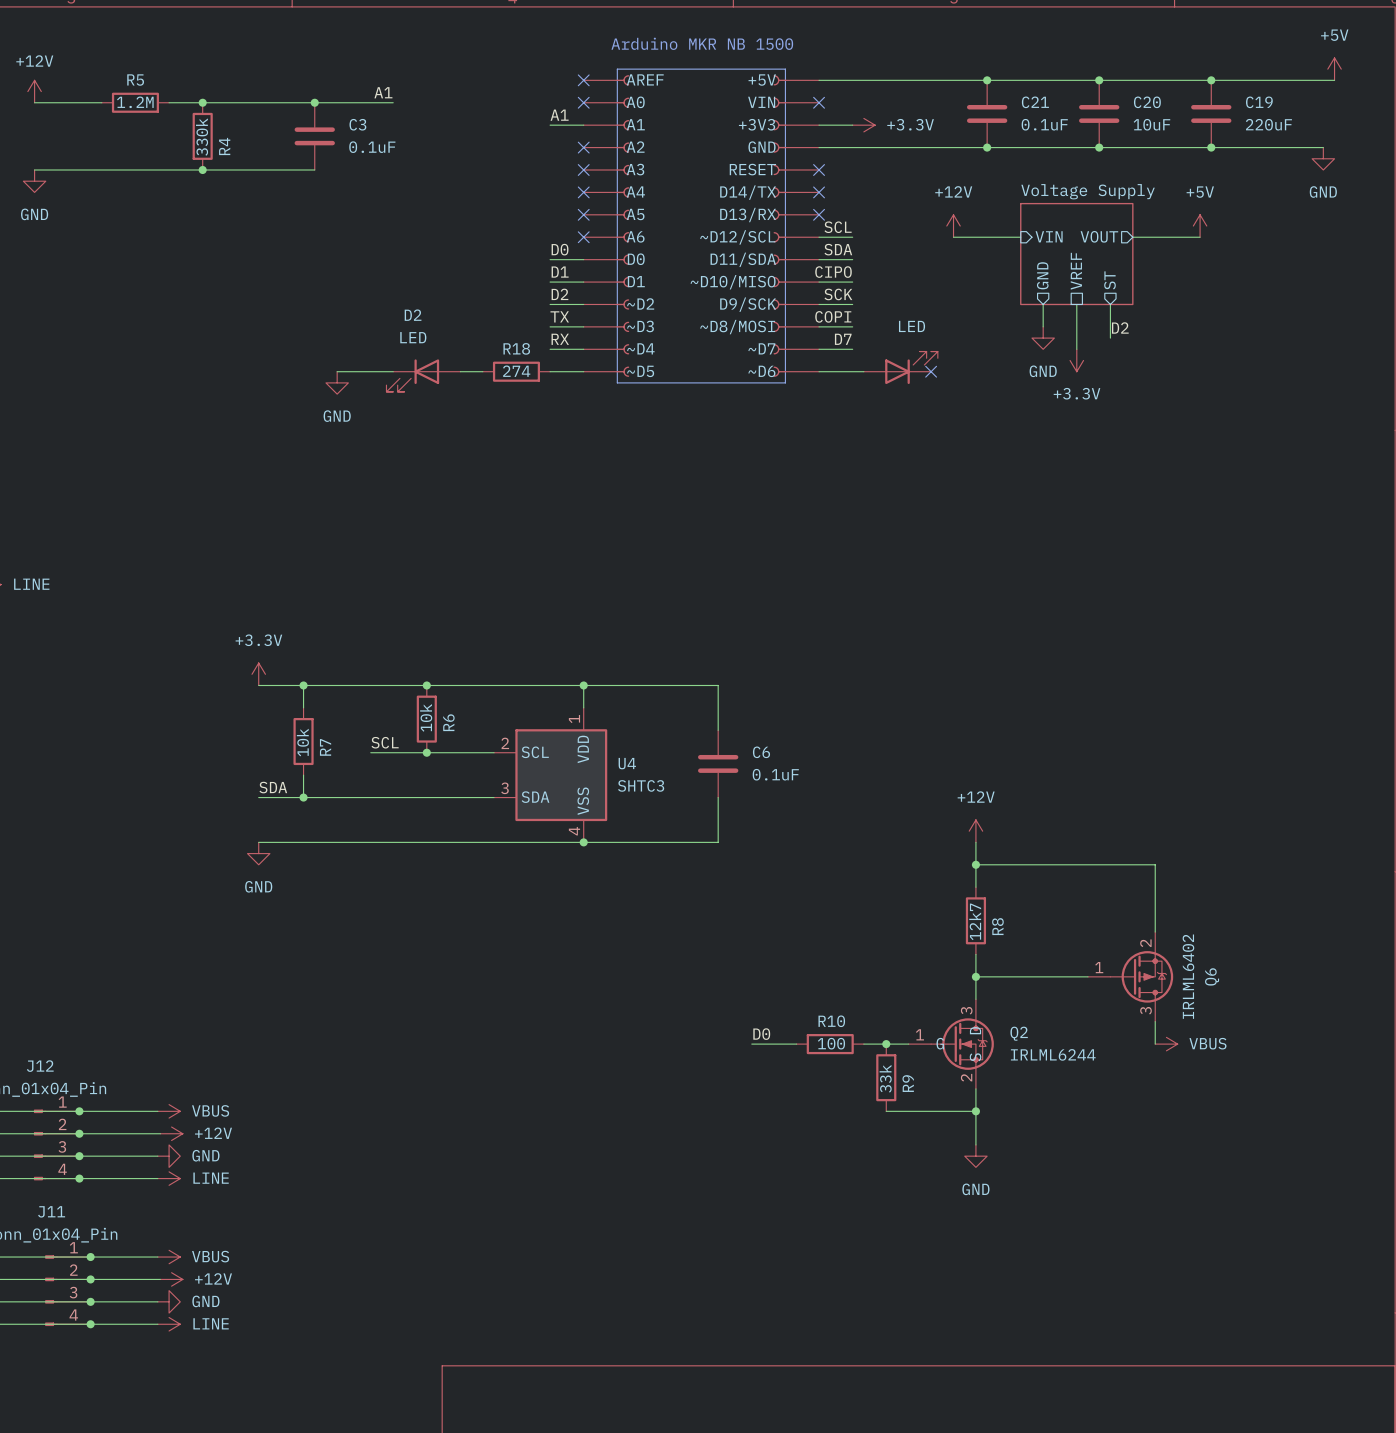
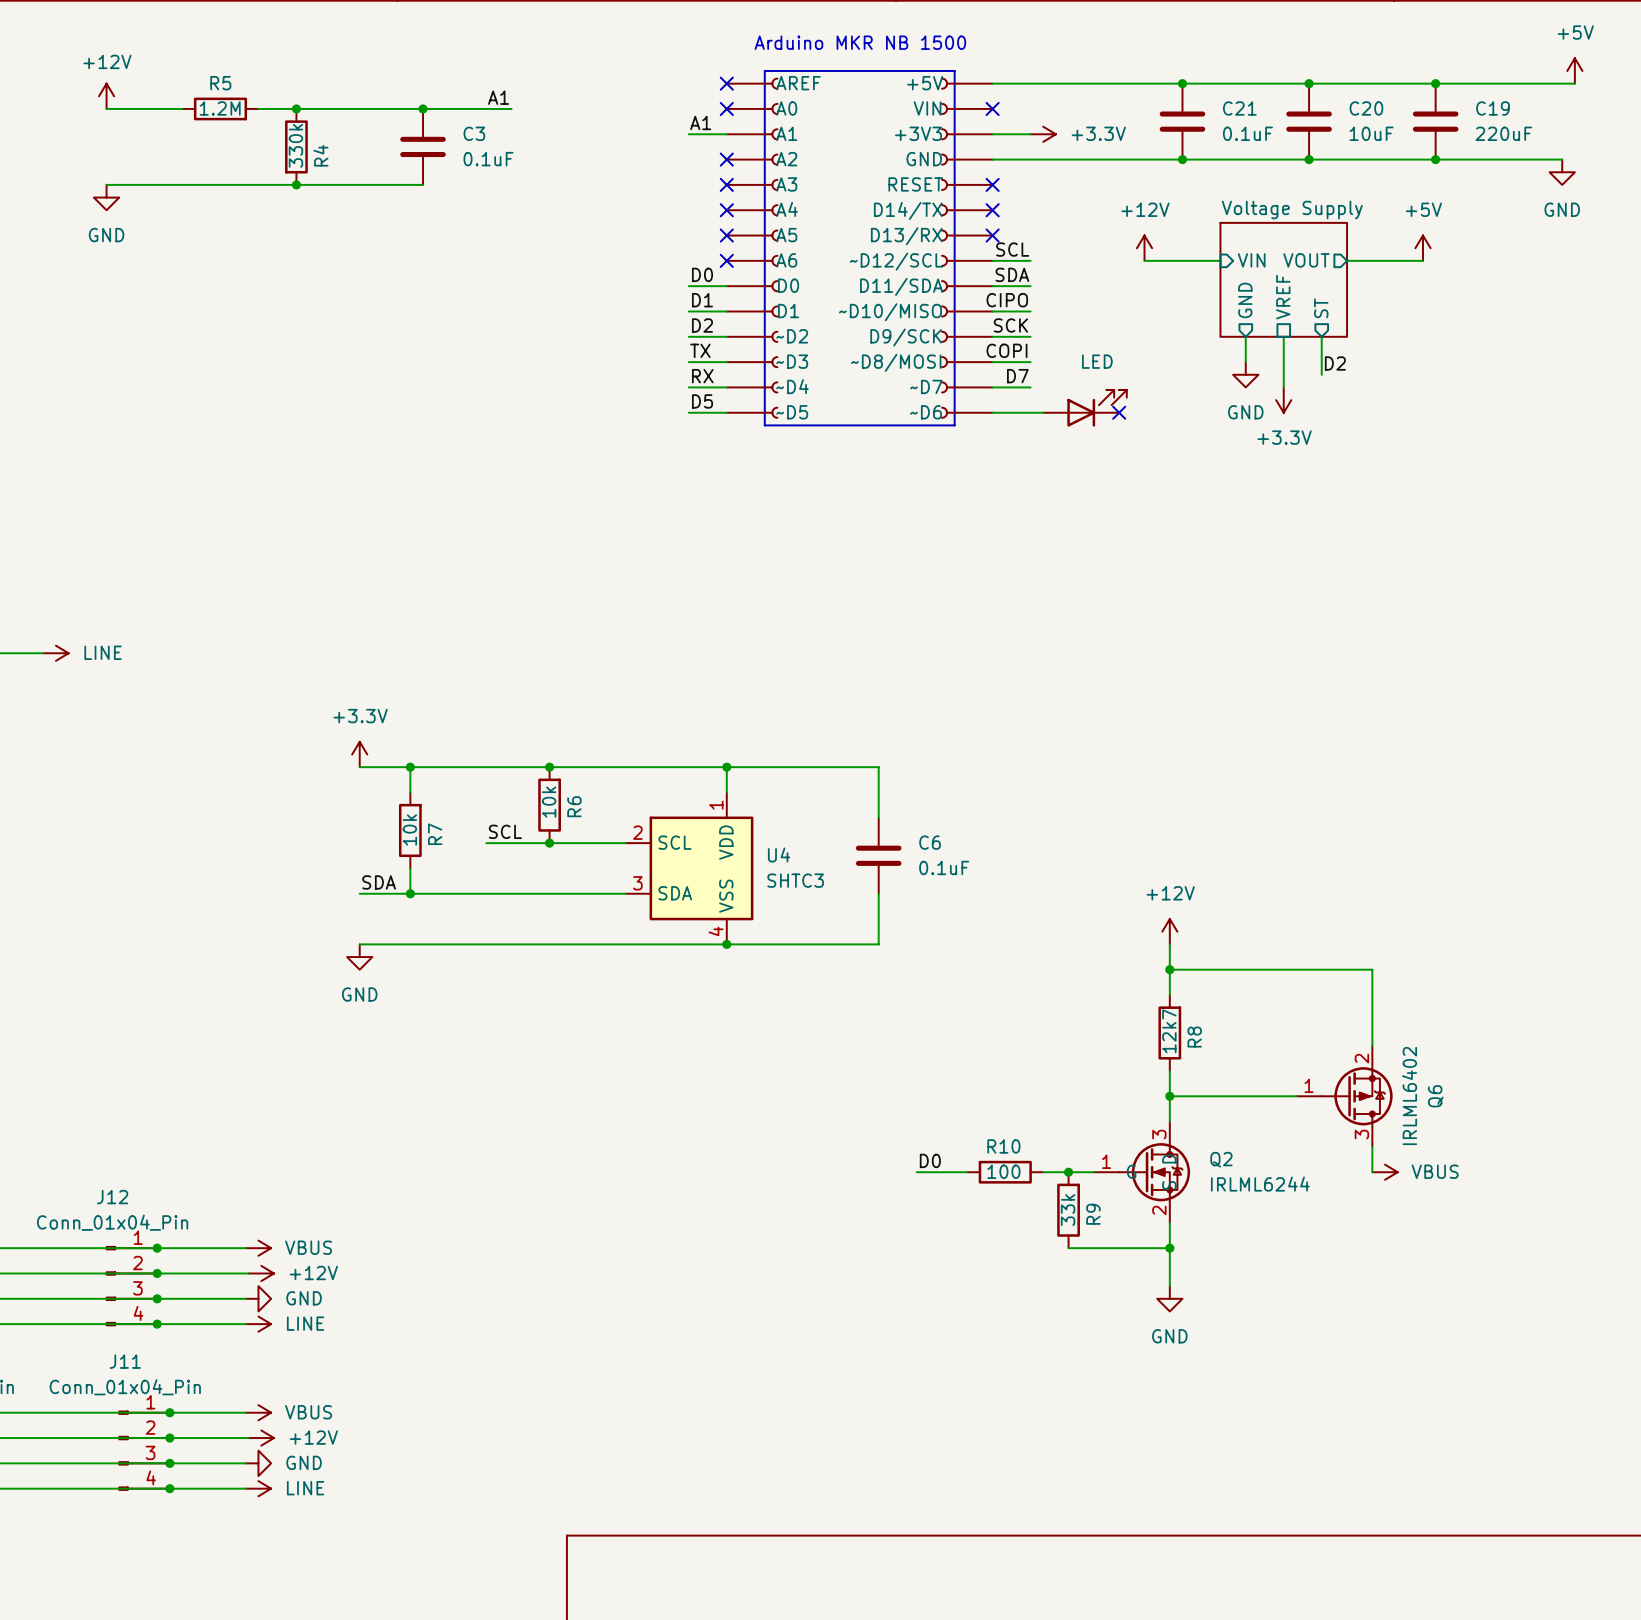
label: none -> D5 (702, 401)
wire: (337, 371) (393, 371) -> none
wire: (460, 371) (482, 371) -> none
R18: 274 (516, 371) -> none
D2: LED (423, 375) -> none
power symbol: GND (337, 382) -> none

